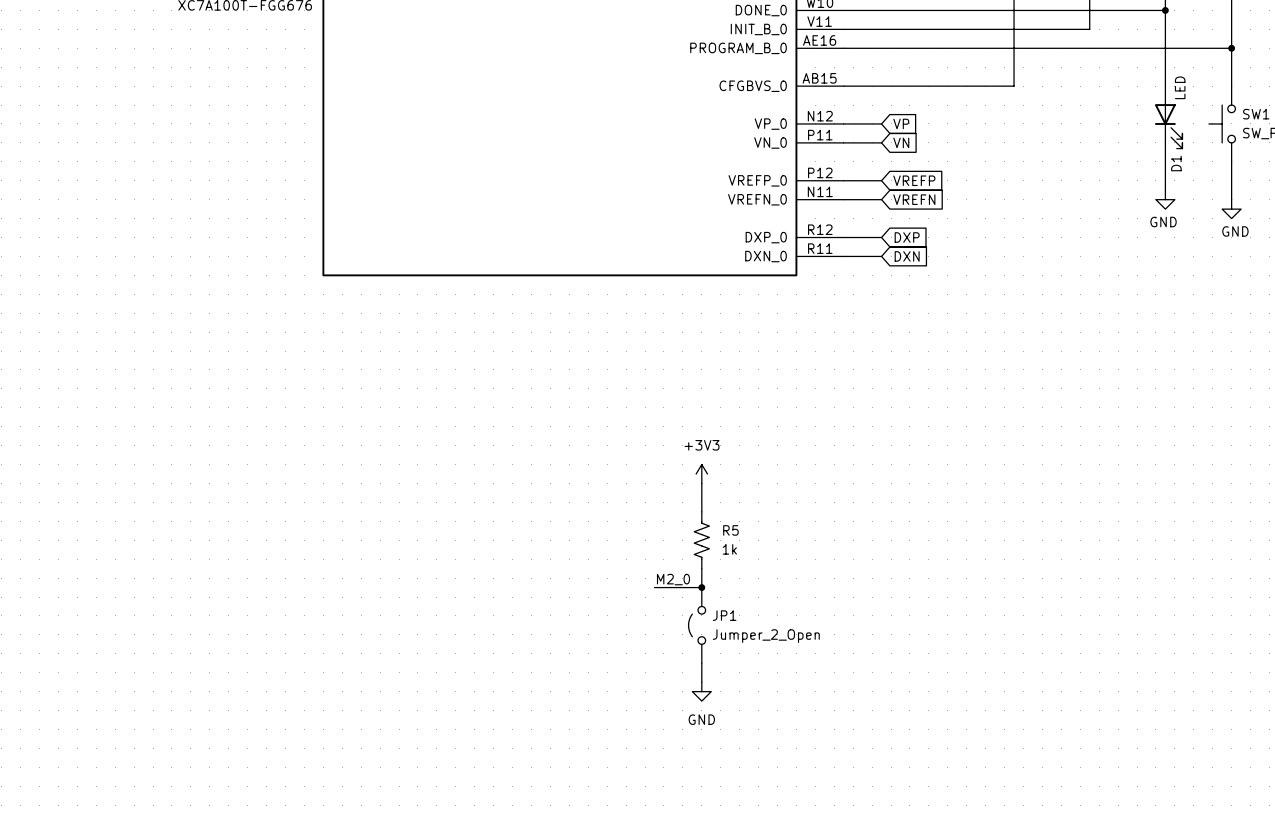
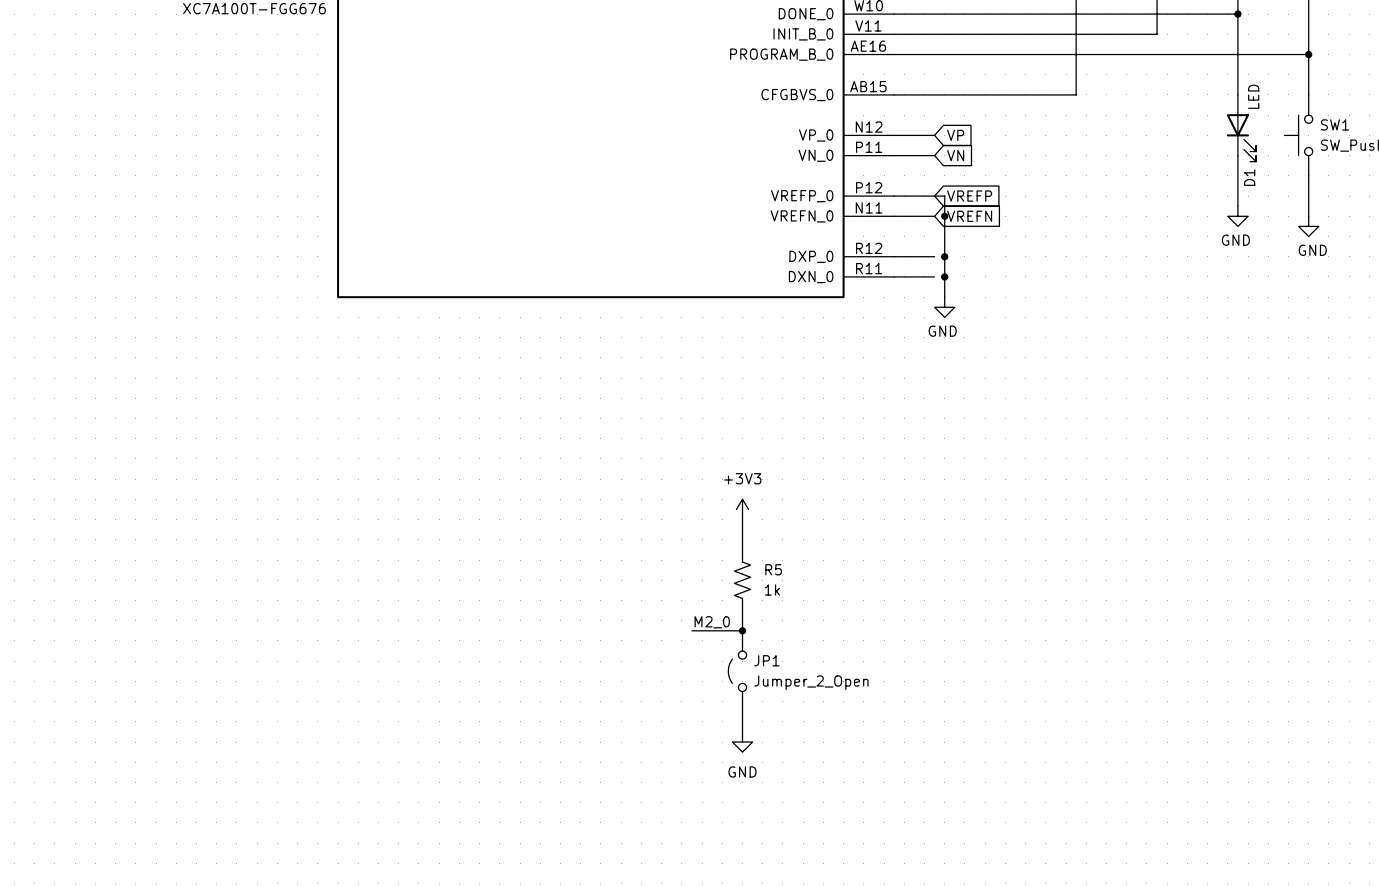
wire: none -> (934, 196) (944, 196) (944, 297)
junction: none -> (944, 216)
junction: none -> (944, 256)
global label: DXP (907, 237) -> none
junction: none -> (944, 276)
global label: DXN (907, 256) -> none
power symbol: none -> GND (944, 307)

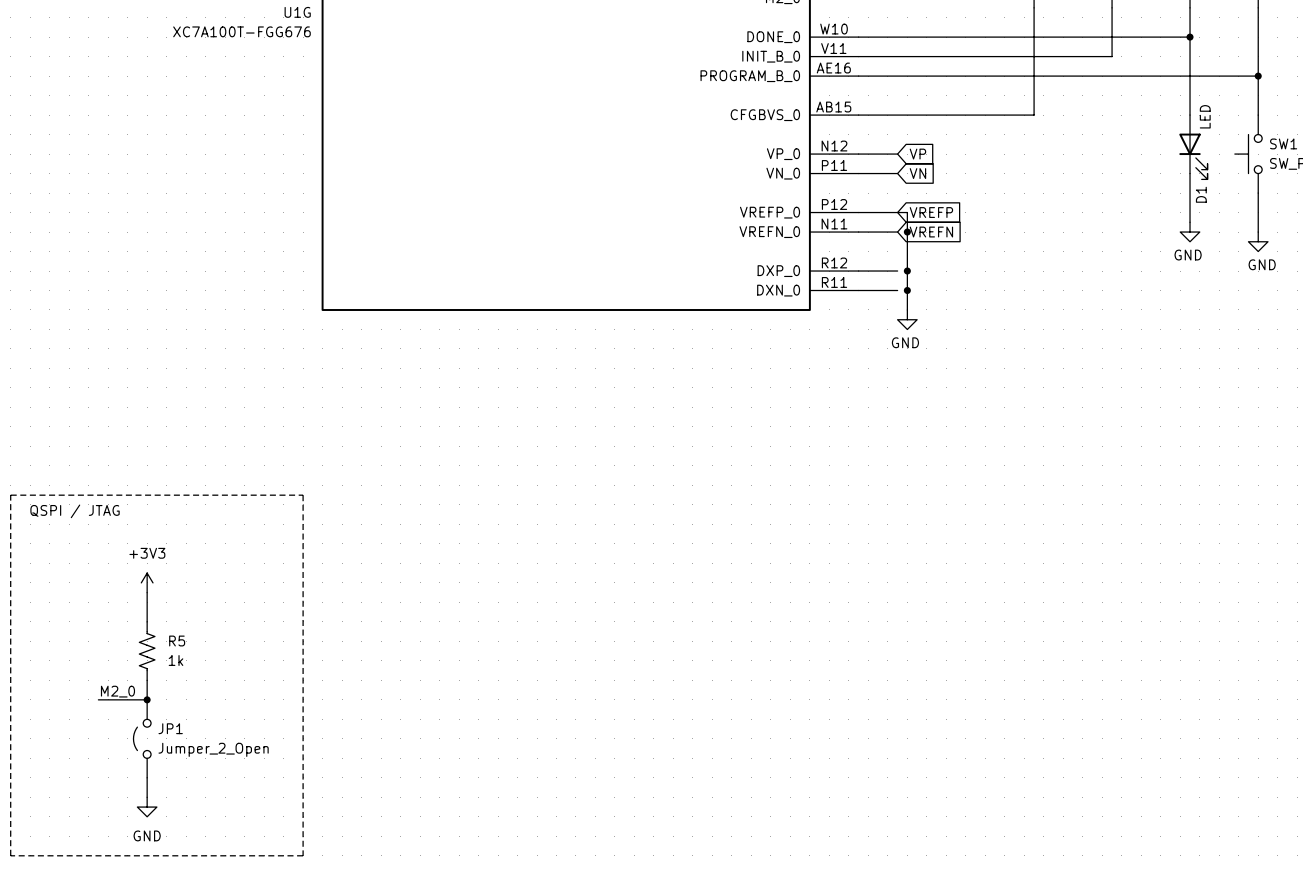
line: none -> (10, 495) (303, 495) (303, 855) (10, 855) (10, 495)
text: none -> QSPI / JTAG (75, 511)
power symbol: +3V3 (742, 509) -> none
wire: (742, 519) (742, 549) -> none
power symbol: none -> +3V3 (147, 582)
R5 position: (742, 580) -> (147, 651)
wire: none -> (147, 592) (147, 621)
wire: (742, 610) (742, 630) (691, 630) -> none
label: M2_0 (712, 622) -> none
junction: (742, 630) -> none
JP1 position: (737, 671) -> (142, 738)
wire: none -> (147, 680) (147, 699) (98, 699)
label: none -> M2_0 (117, 691)
junction: none -> (147, 699)
wire: (742, 711) (742, 731) -> none
power symbol: GND (742, 742) -> none
wire: none -> (147, 777) (147, 797)
power symbol: none -> GND (147, 807)

